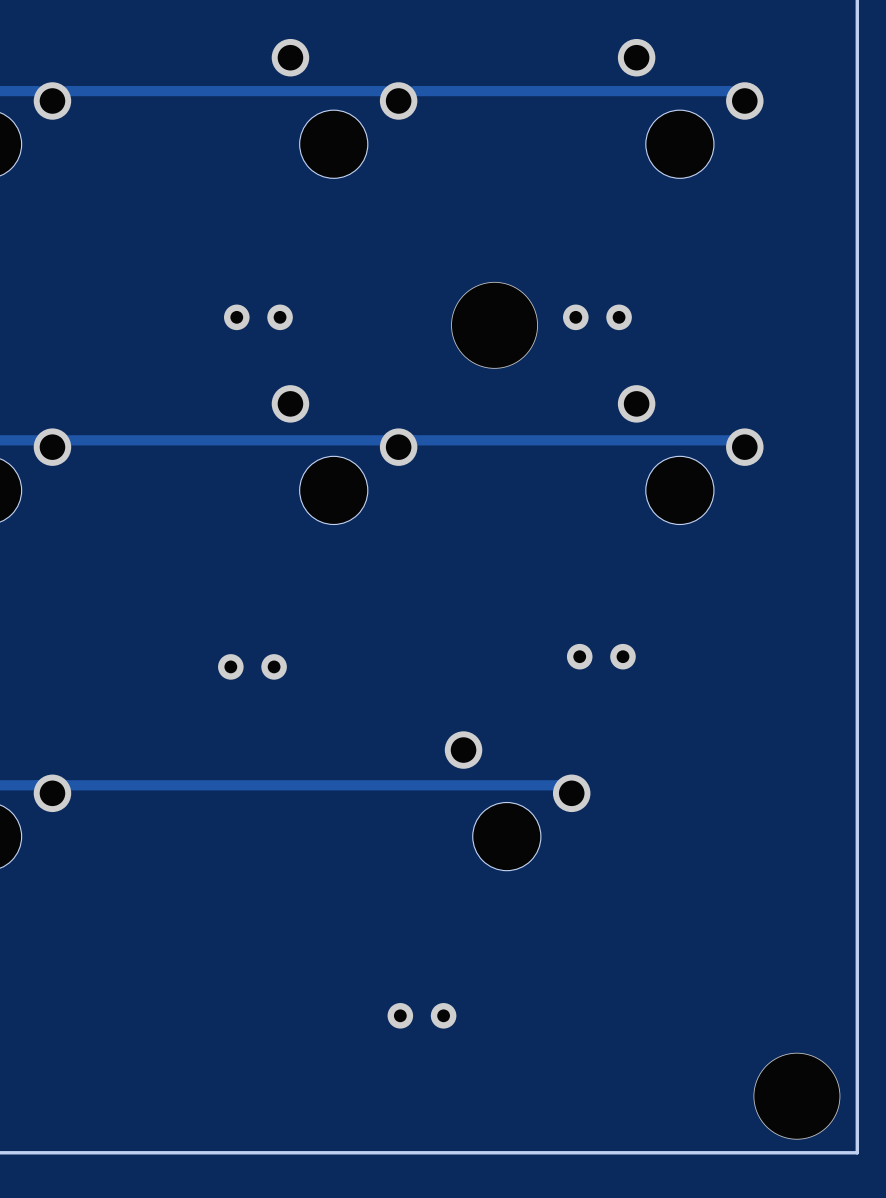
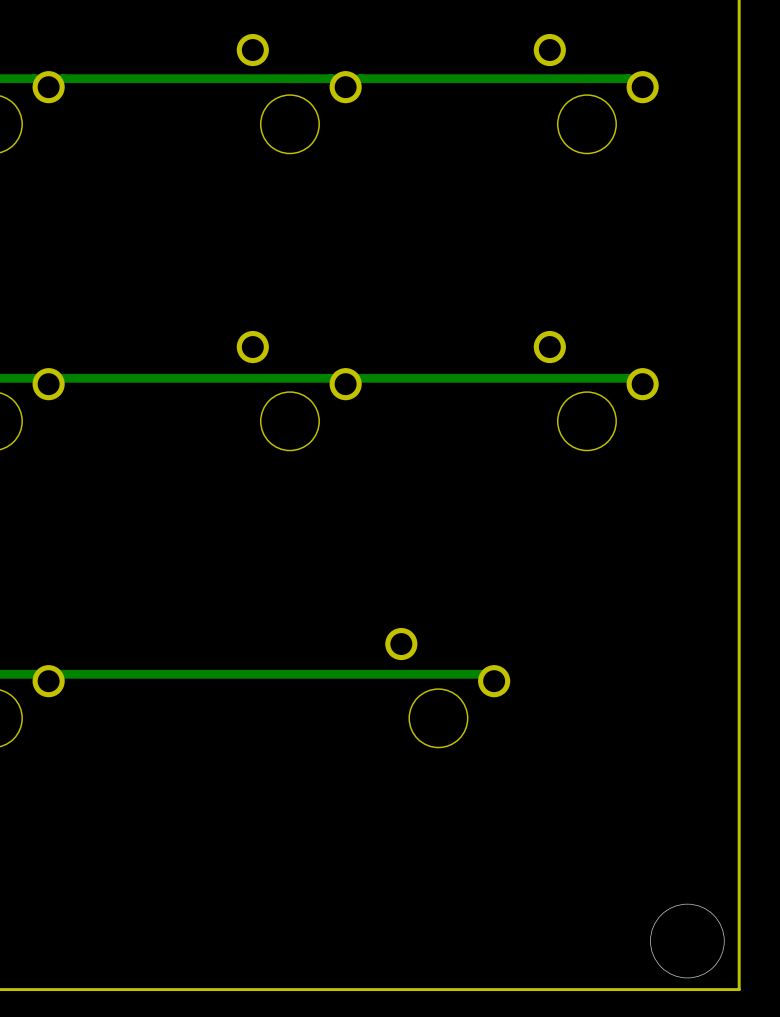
part: (236, 317) -> none
part: (280, 317) -> none
part: (575, 317) -> none
part: (619, 317) -> none
via: (494, 325) -> none
part: (579, 656) -> none
part: (622, 656) -> none
part: (230, 666) -> none
part: (274, 666) -> none
part: (400, 1015) -> none
part: (443, 1015) -> none

